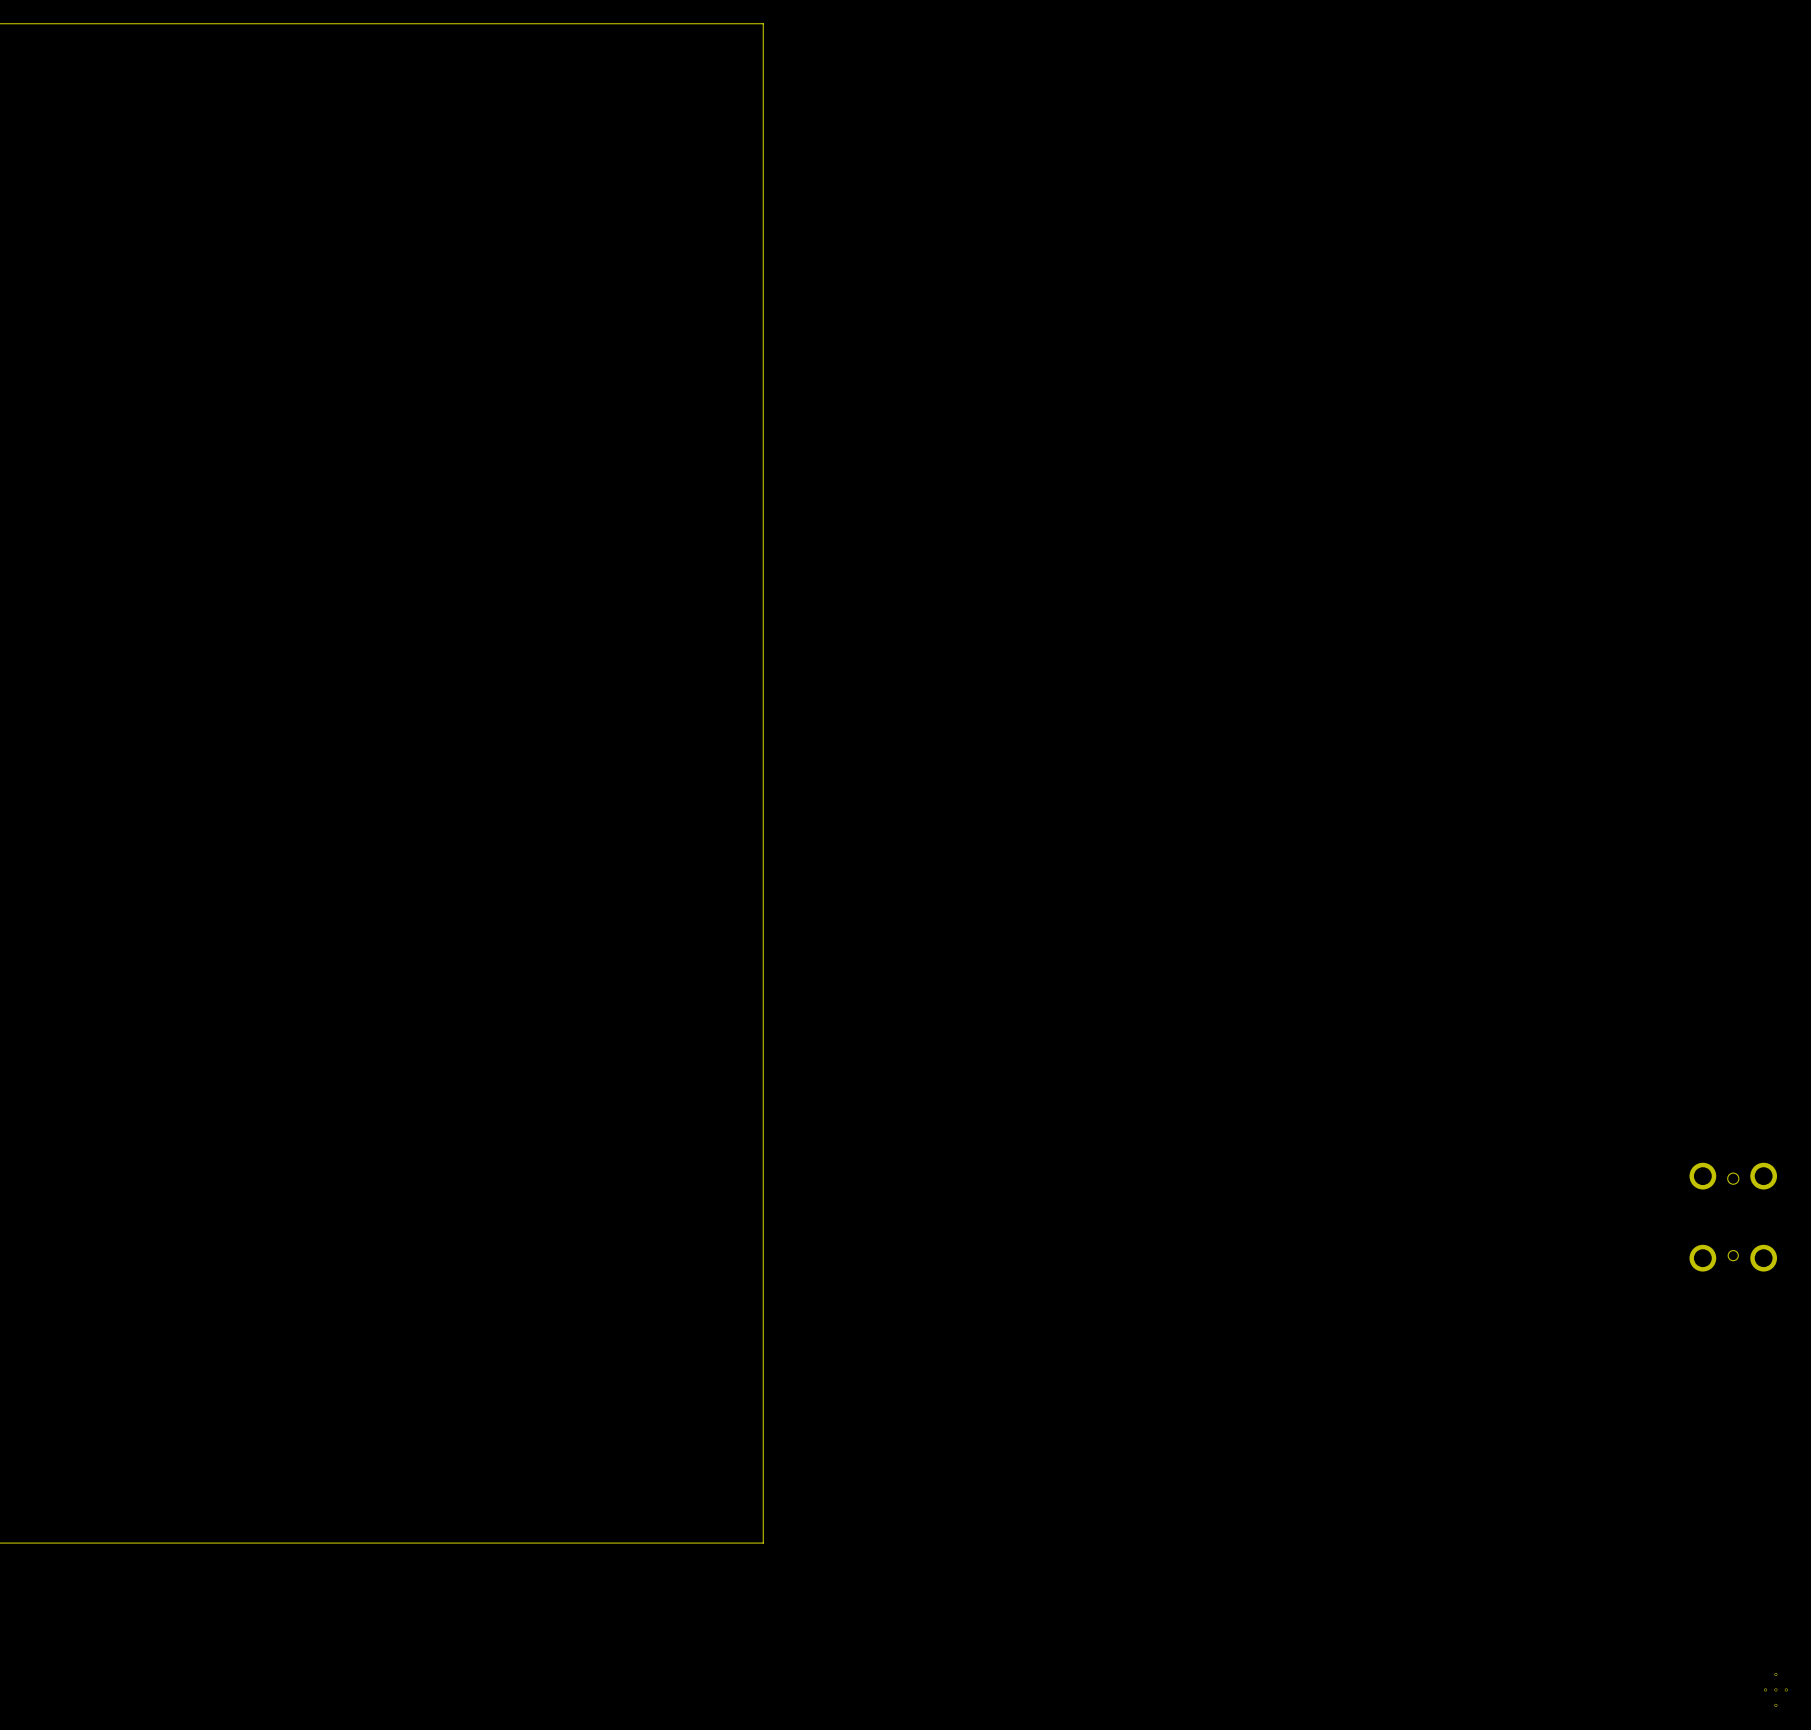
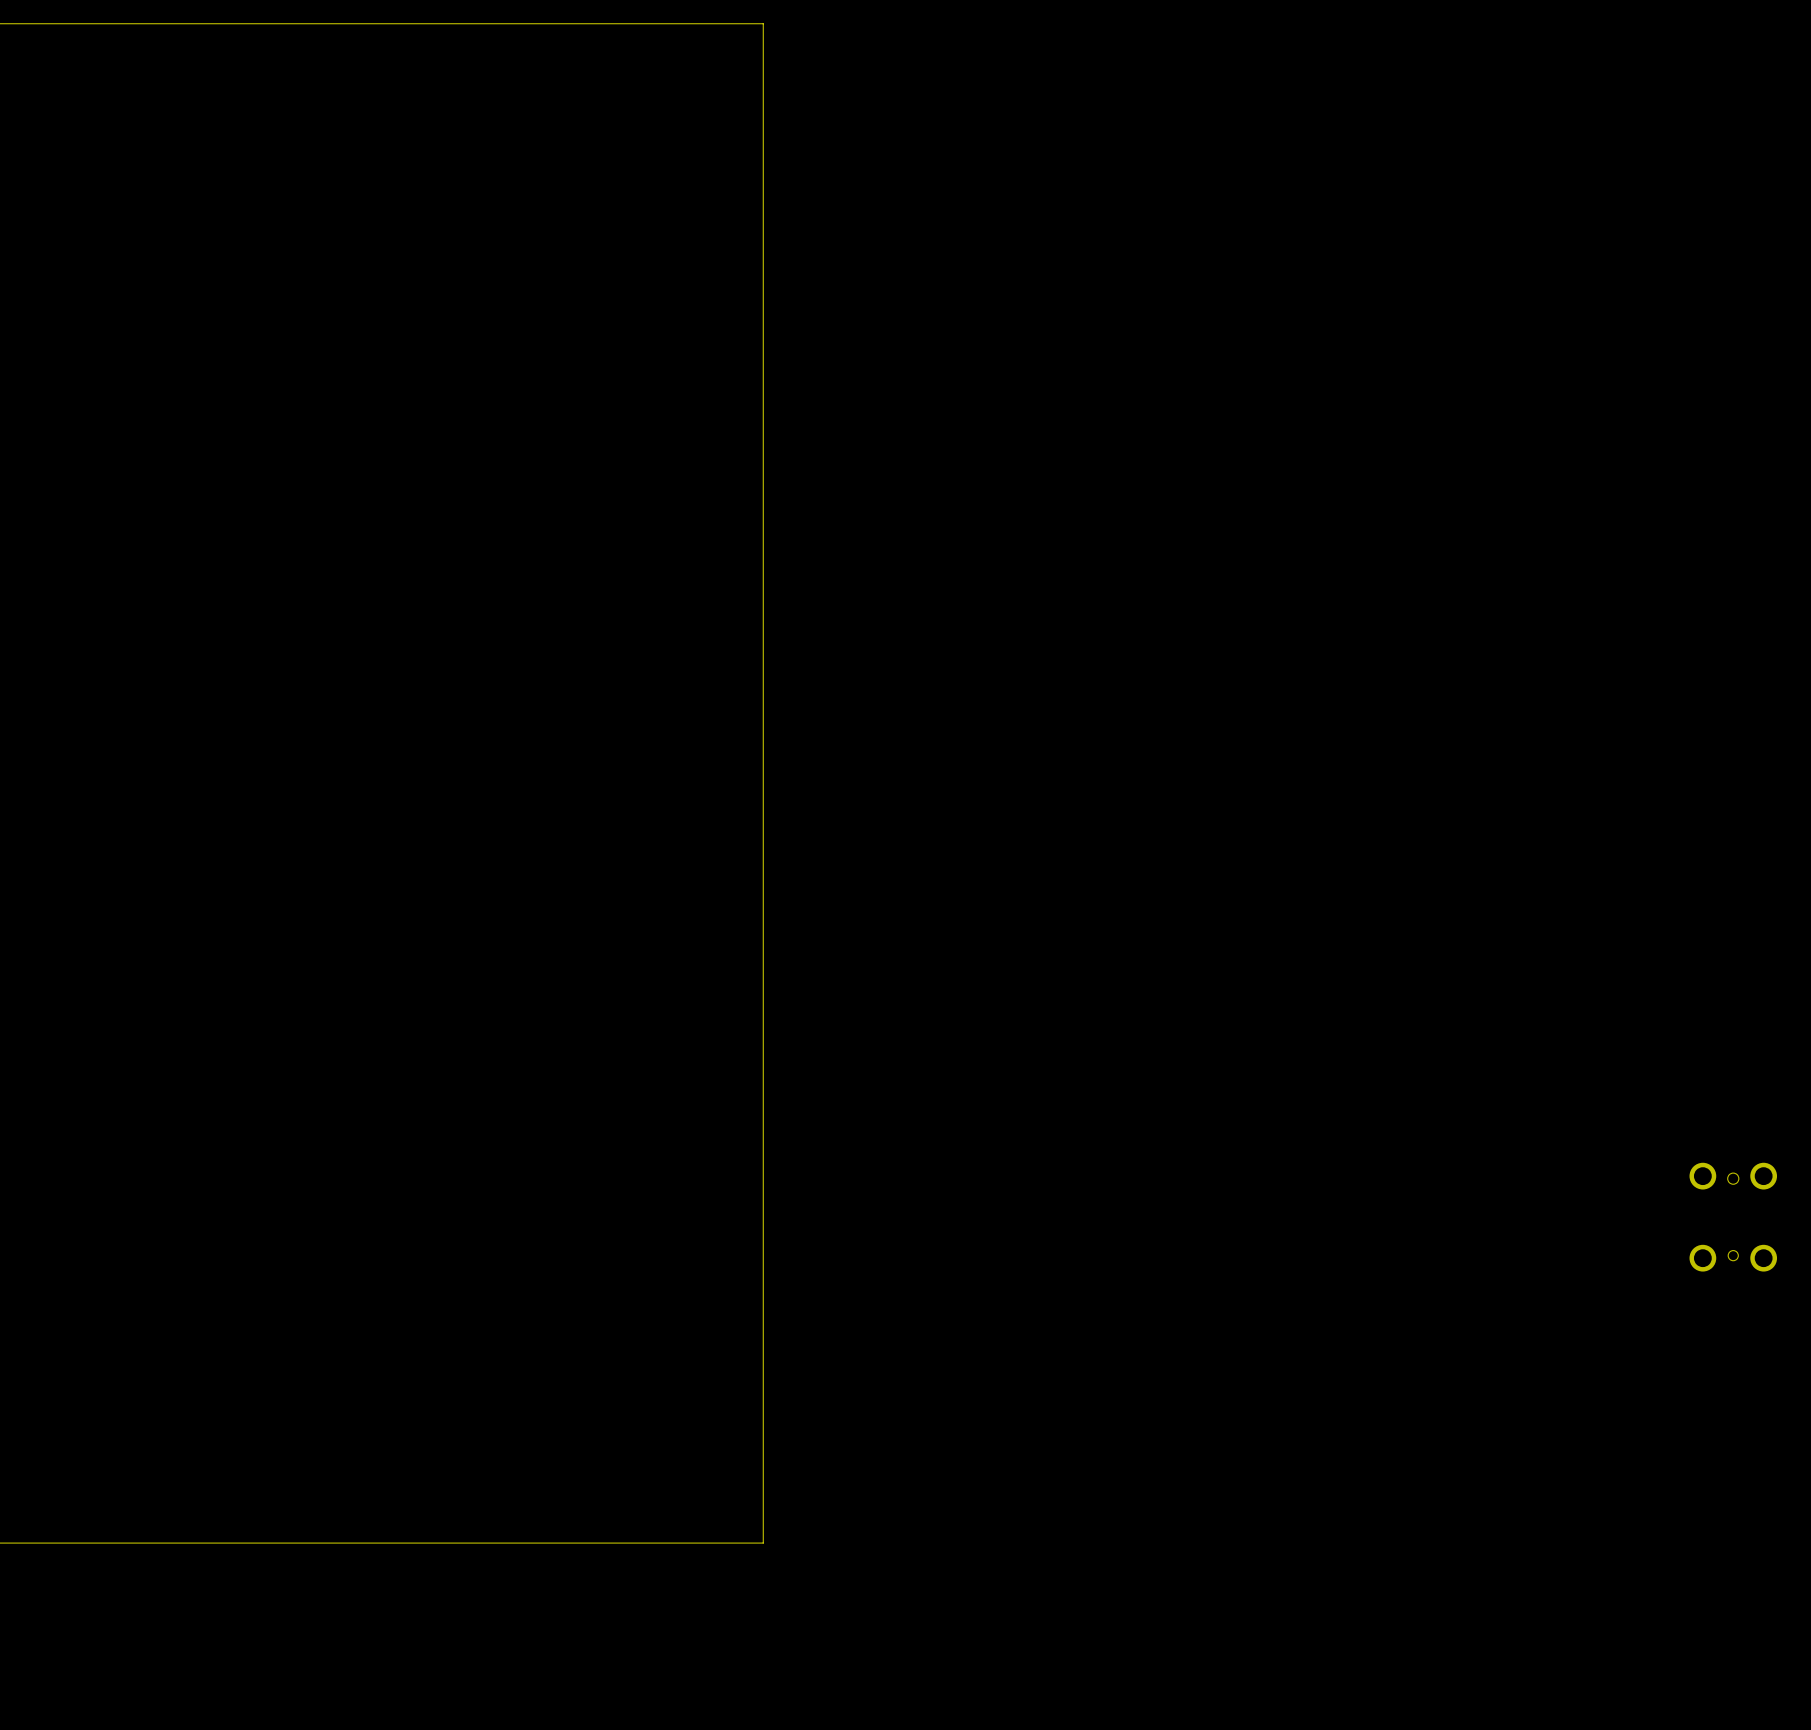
part: (1775, 1689) -> none

